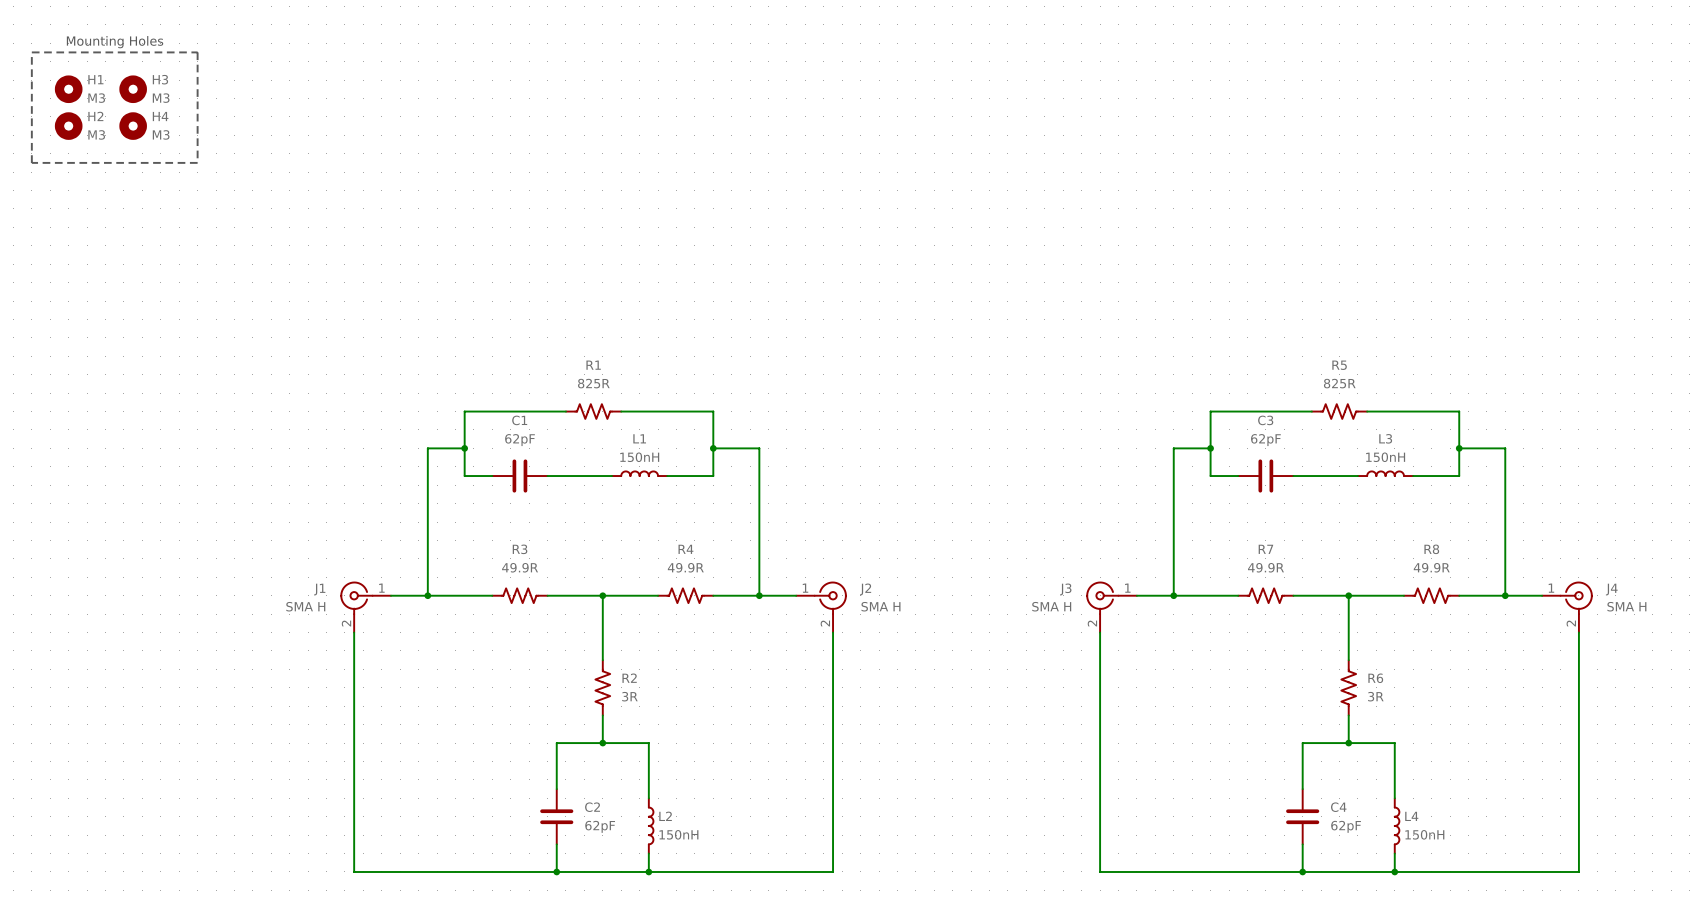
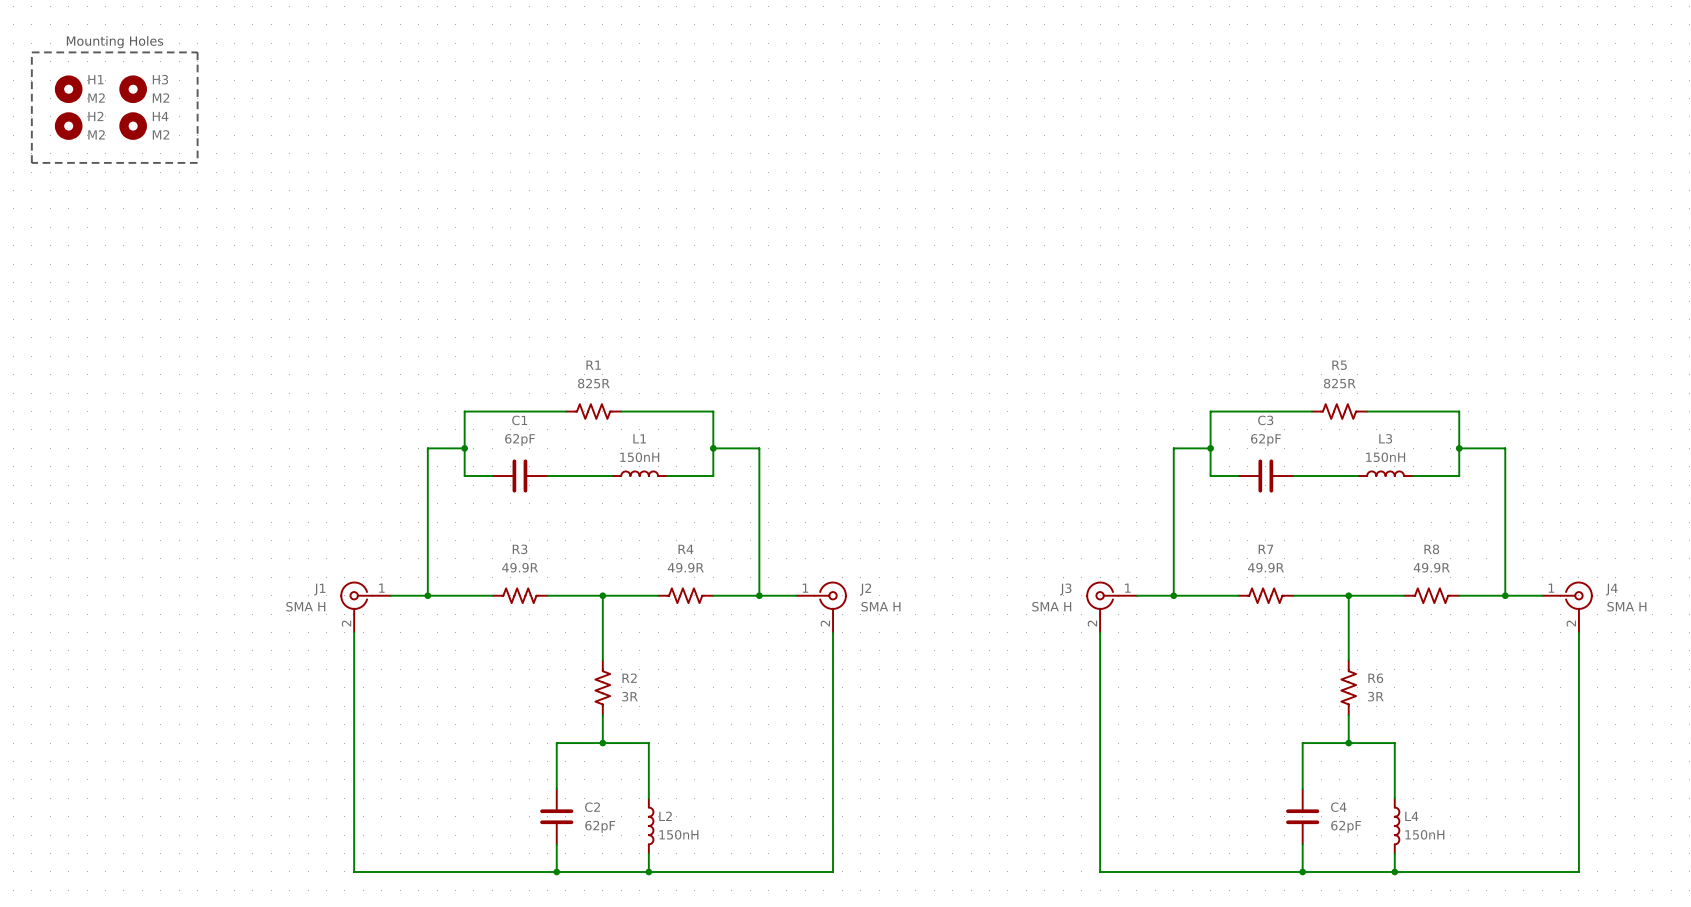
H1 value: M3 (96, 98) -> M2 (96, 98)
H3 value: M3 (161, 98) -> M2 (161, 98)
H2 value: M3 (96, 134) -> M2 (96, 134)
H4 value: M3 (161, 134) -> M2 (161, 134)

